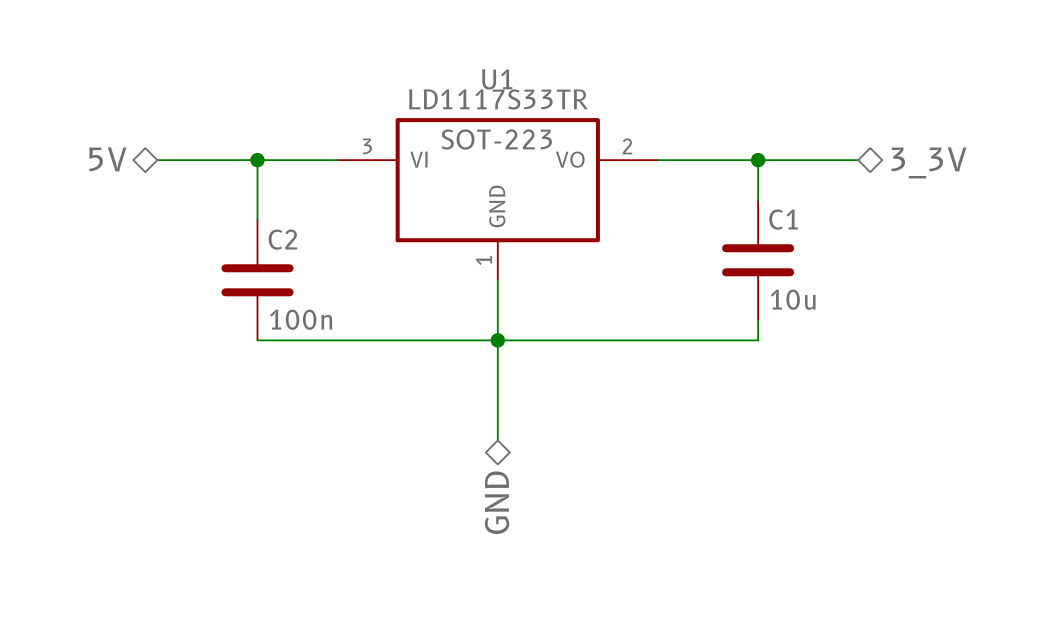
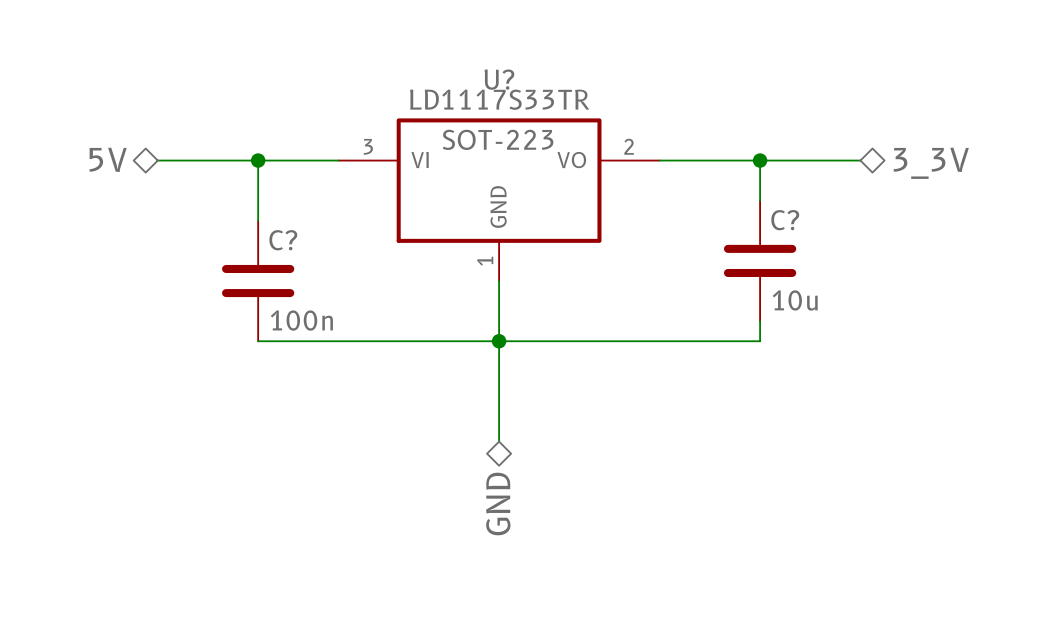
U1 name: U1 (497, 79) -> U? (499, 79)
C1 name: C1 (783, 219) -> C? (785, 220)
C2 name: C2 (282, 239) -> C? (283, 240)

